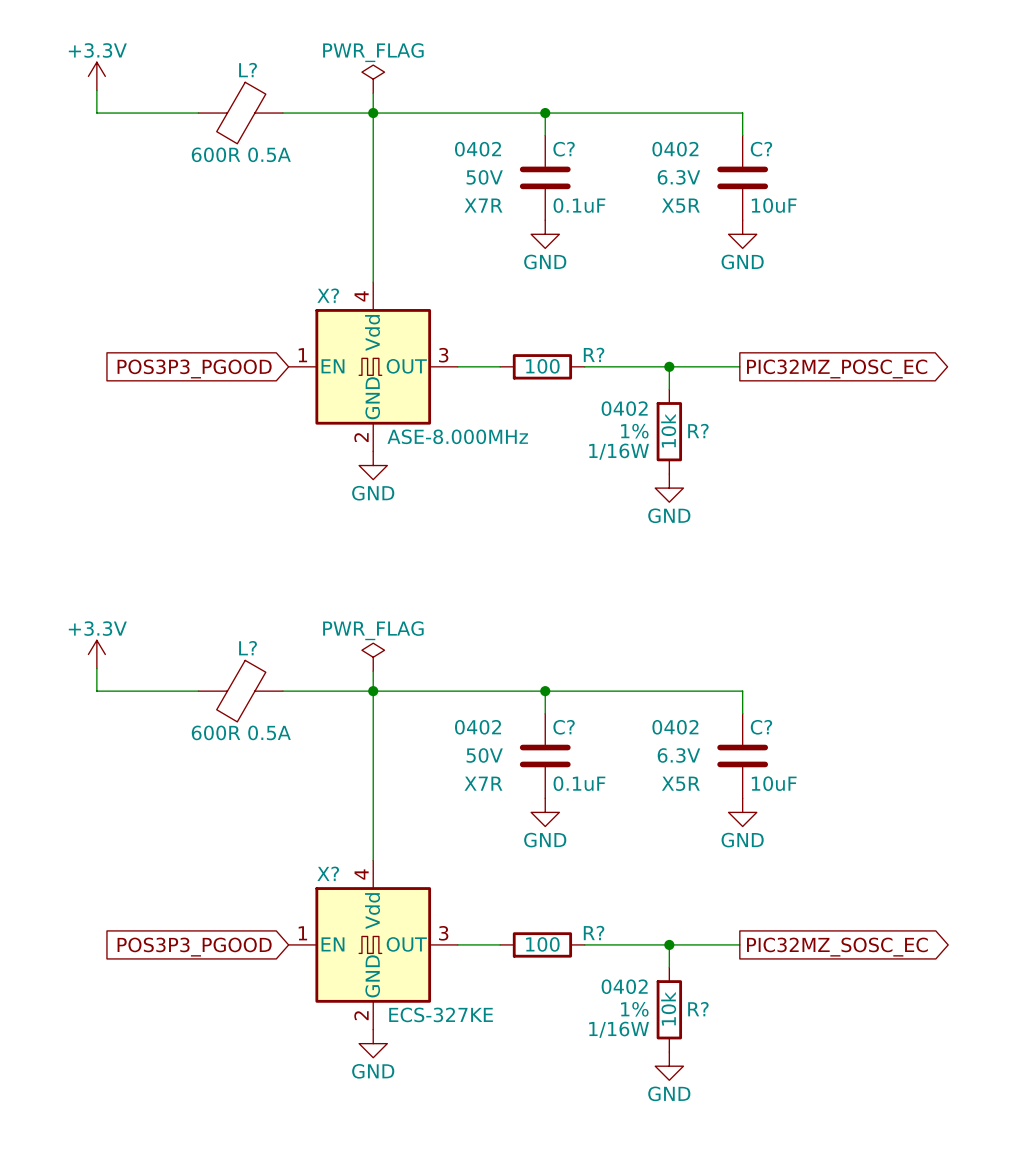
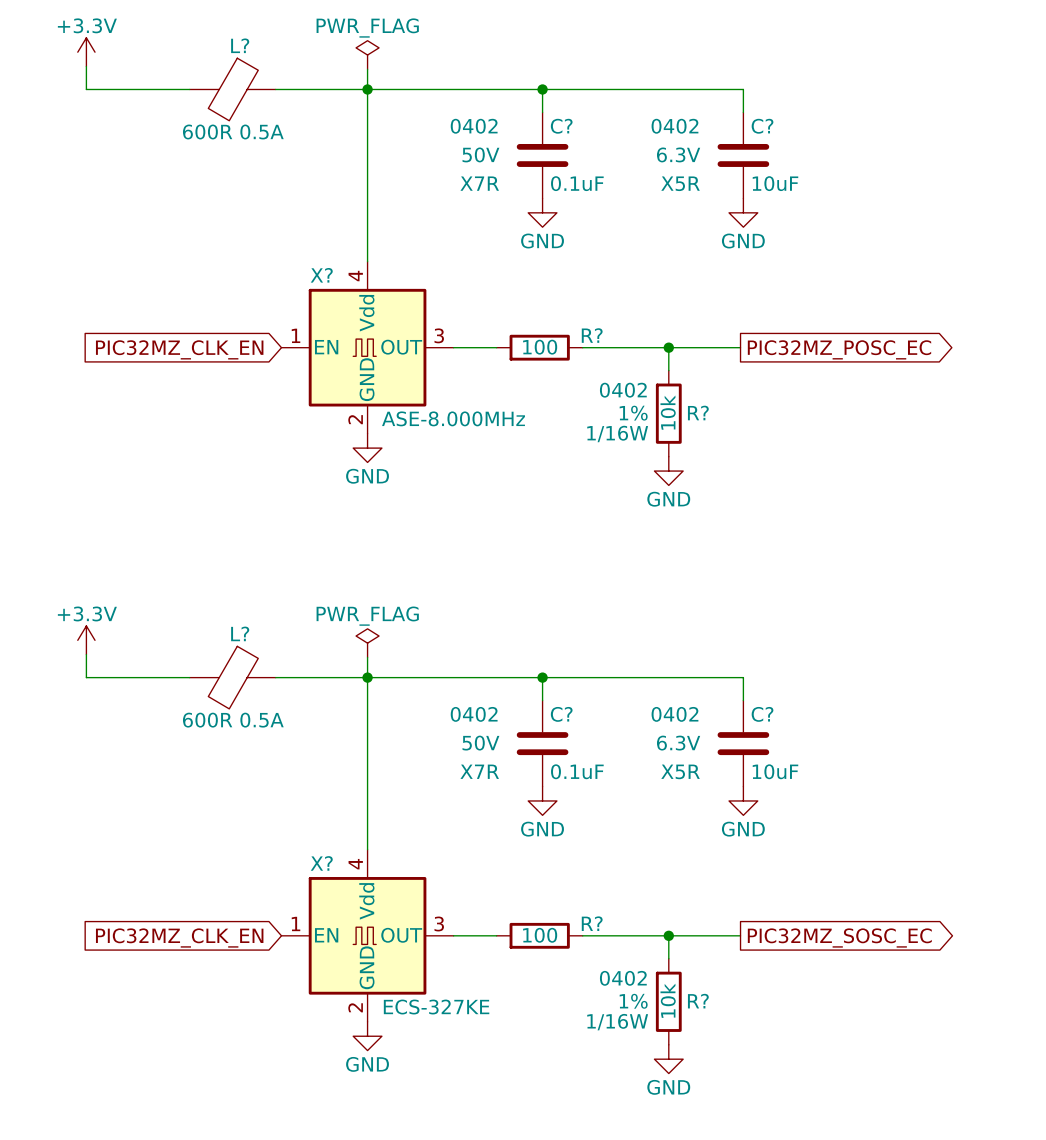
global label: POS3P3_PGOOD (194, 368) -> PIC32MZ_CLK_EN (179, 349)
global label: POS3P3_PGOOD (194, 947) -> PIC32MZ_CLK_EN (179, 938)

